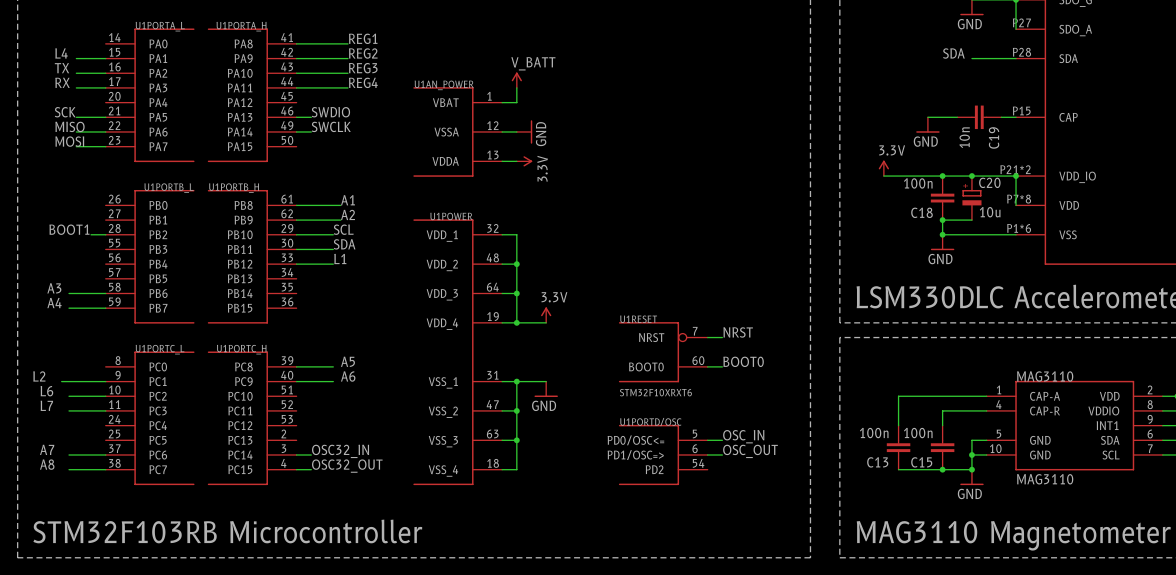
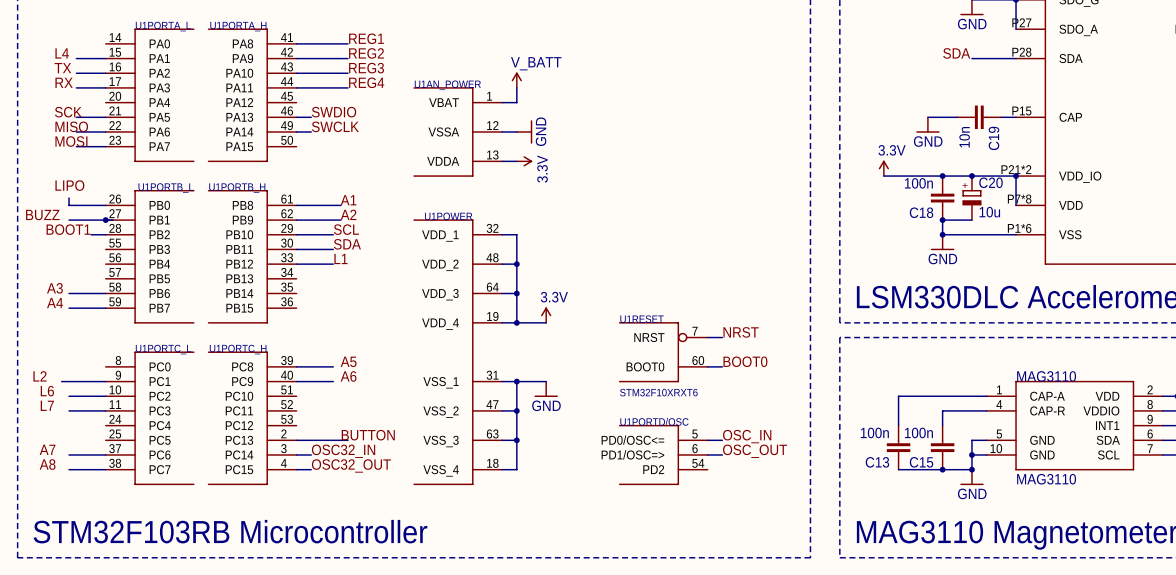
label: none -> LIPO (69, 185)
wire: none -> (69, 198) (69, 205) (105, 205)
label: none -> BUZZ (42, 215)
wire: none -> (69, 220) (113, 220)
junction: none -> (105, 220)
label: none -> BUTTON (368, 435)
wire: none -> (296, 440) (347, 440)

